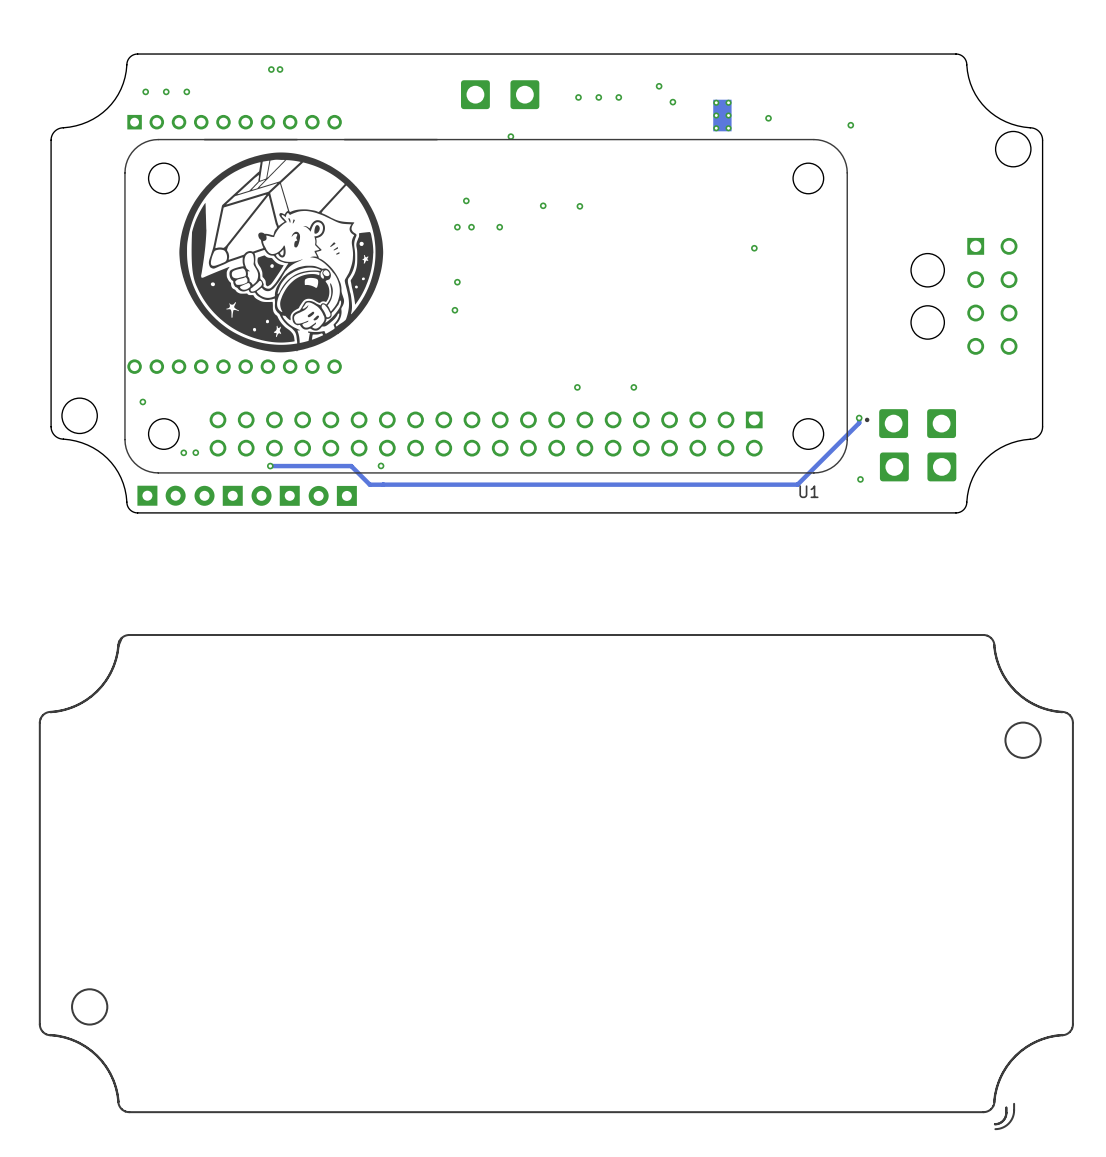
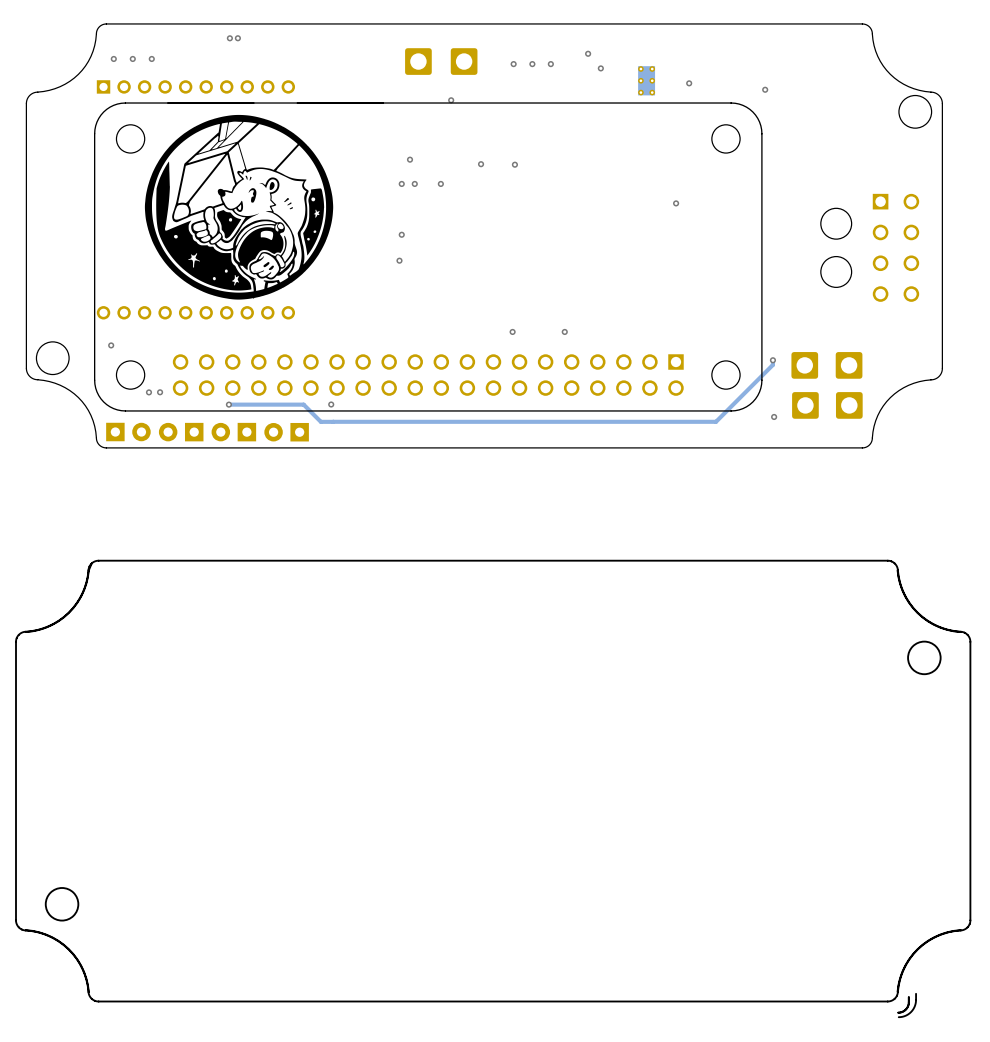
U1: (496, 306) -> none

